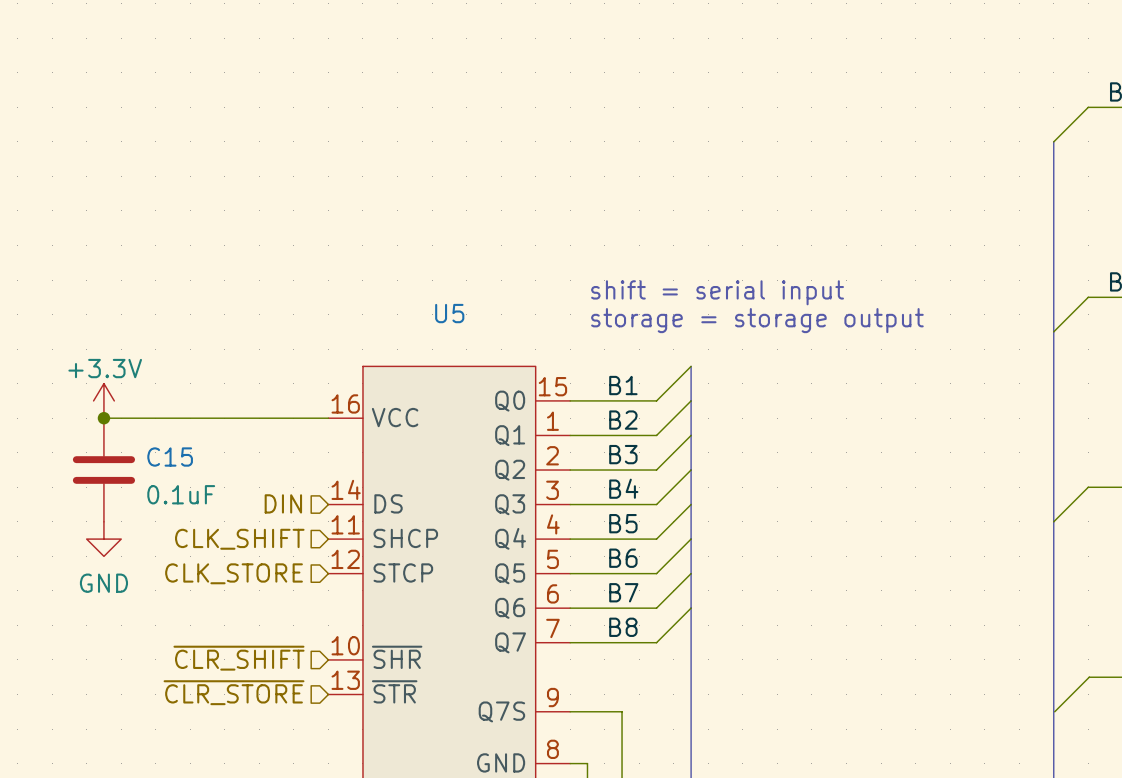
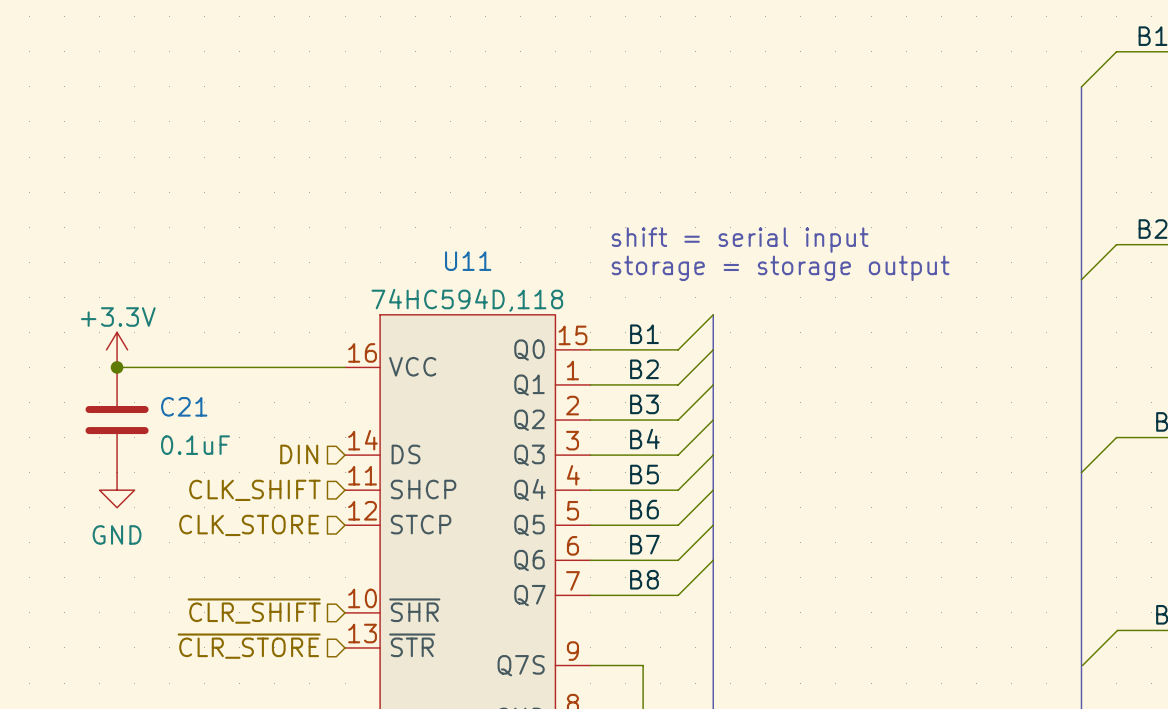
U5 name: U5 (449, 313) -> U11 (468, 261)
U5 value: none -> 74HC594D,118 (467, 300)
C15 name: C15 (170, 457) -> C21 (184, 406)

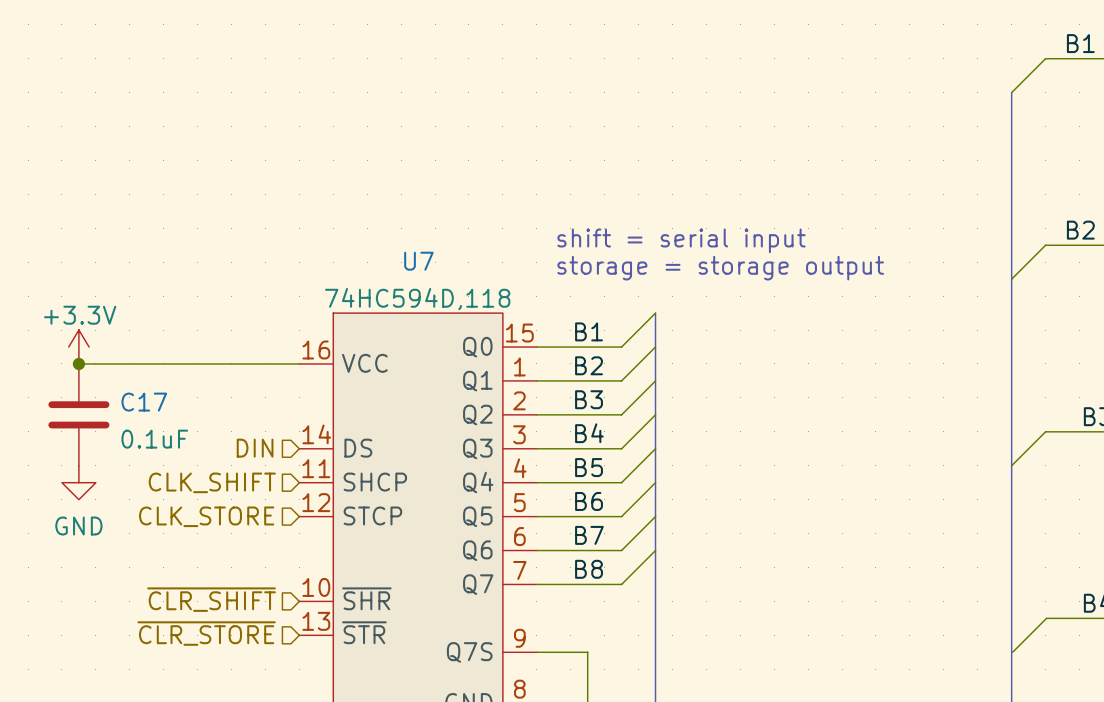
U11 name: U11 (468, 261) -> U7 (418, 261)
C21 name: C21 (184, 406) -> C17 (144, 402)

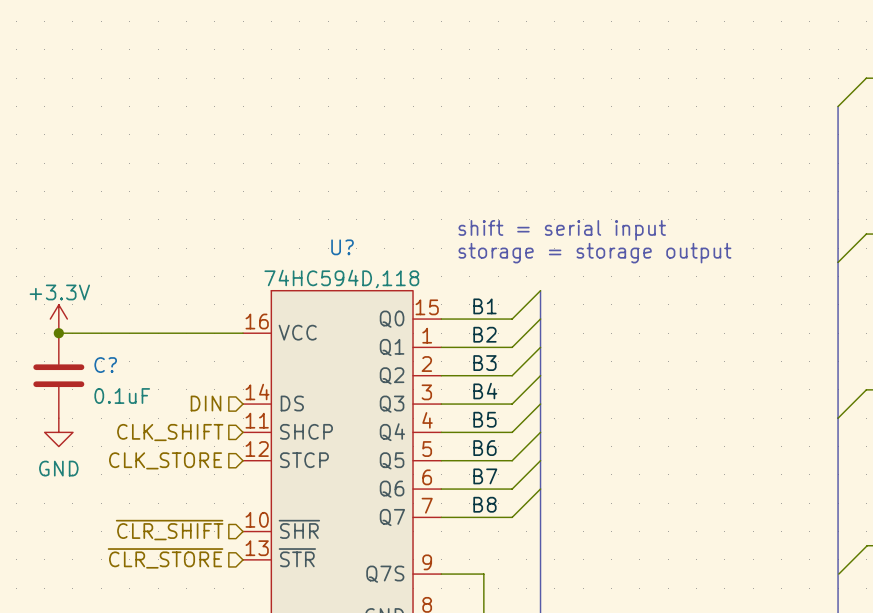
U7 name: U7 (418, 261) -> U? (342, 247)
C17 name: C17 (144, 402) -> C? (105, 365)

